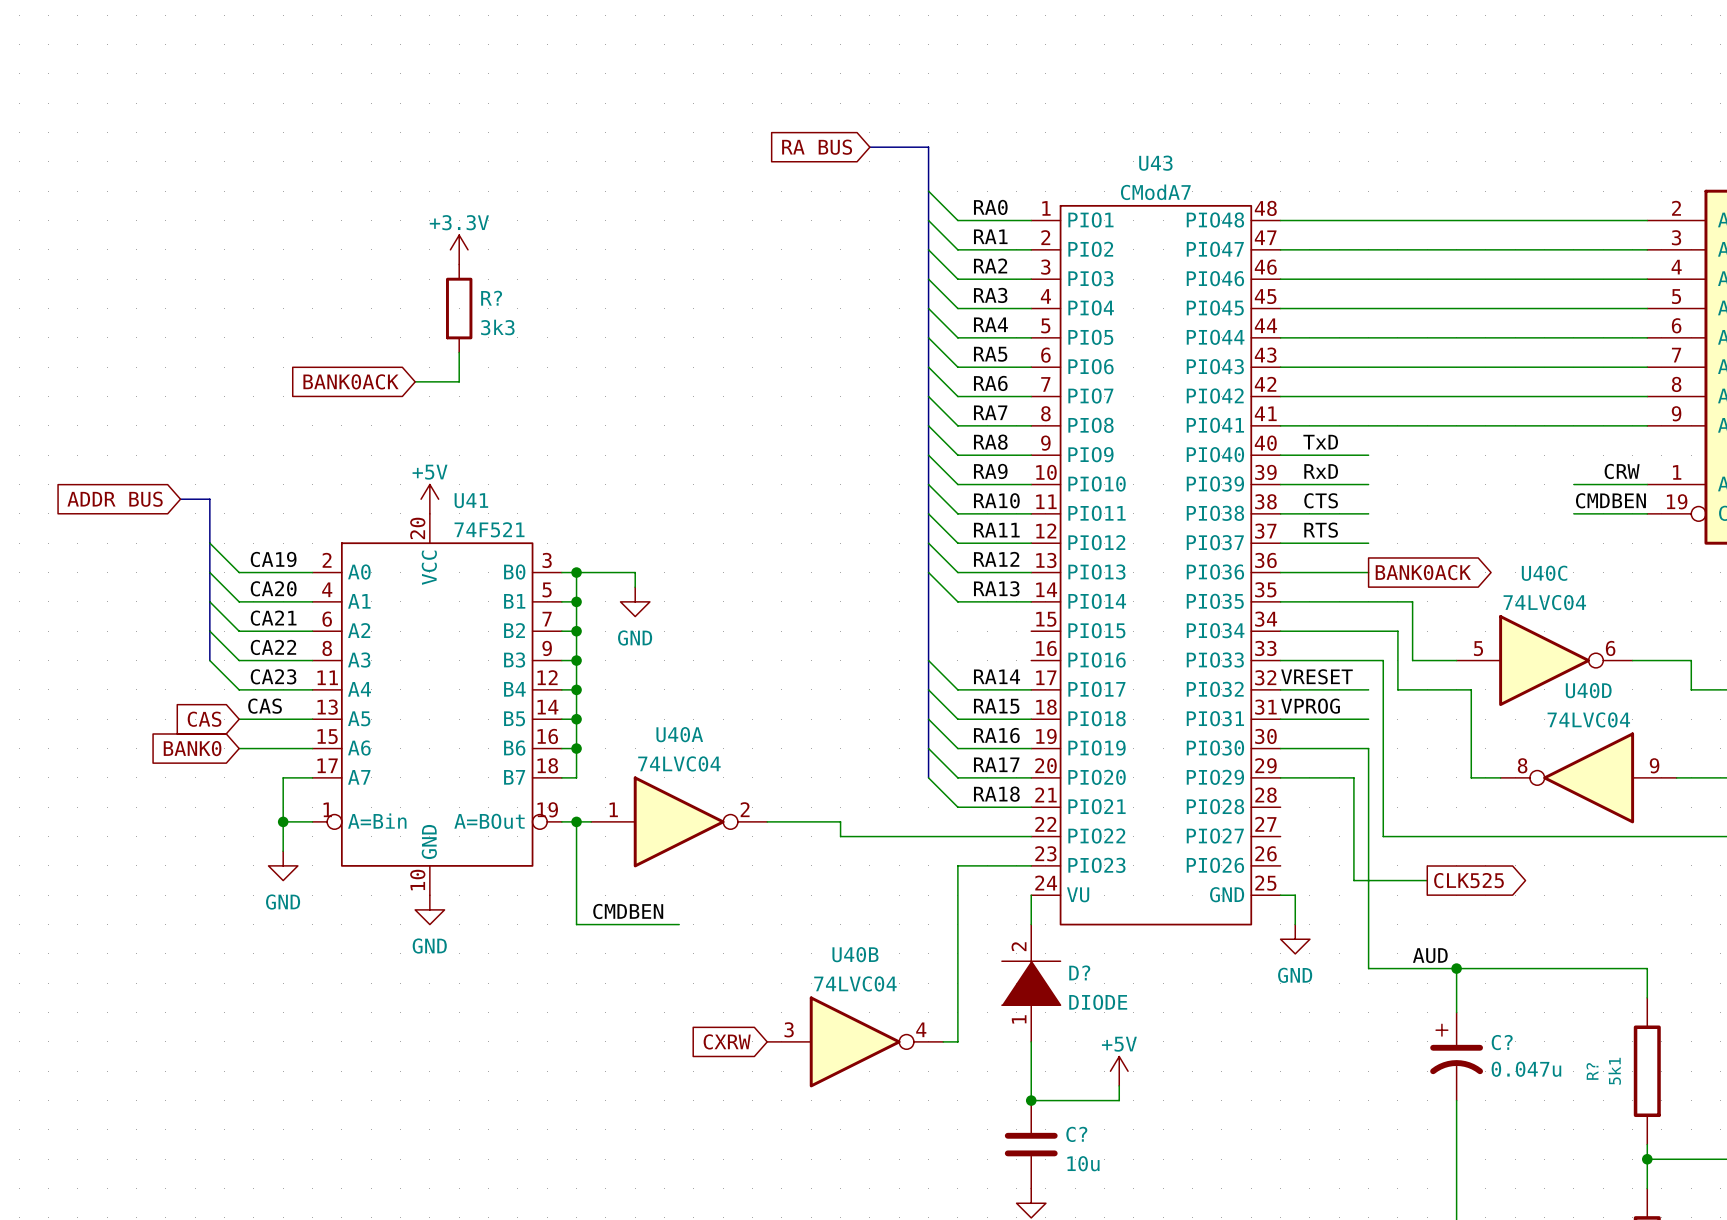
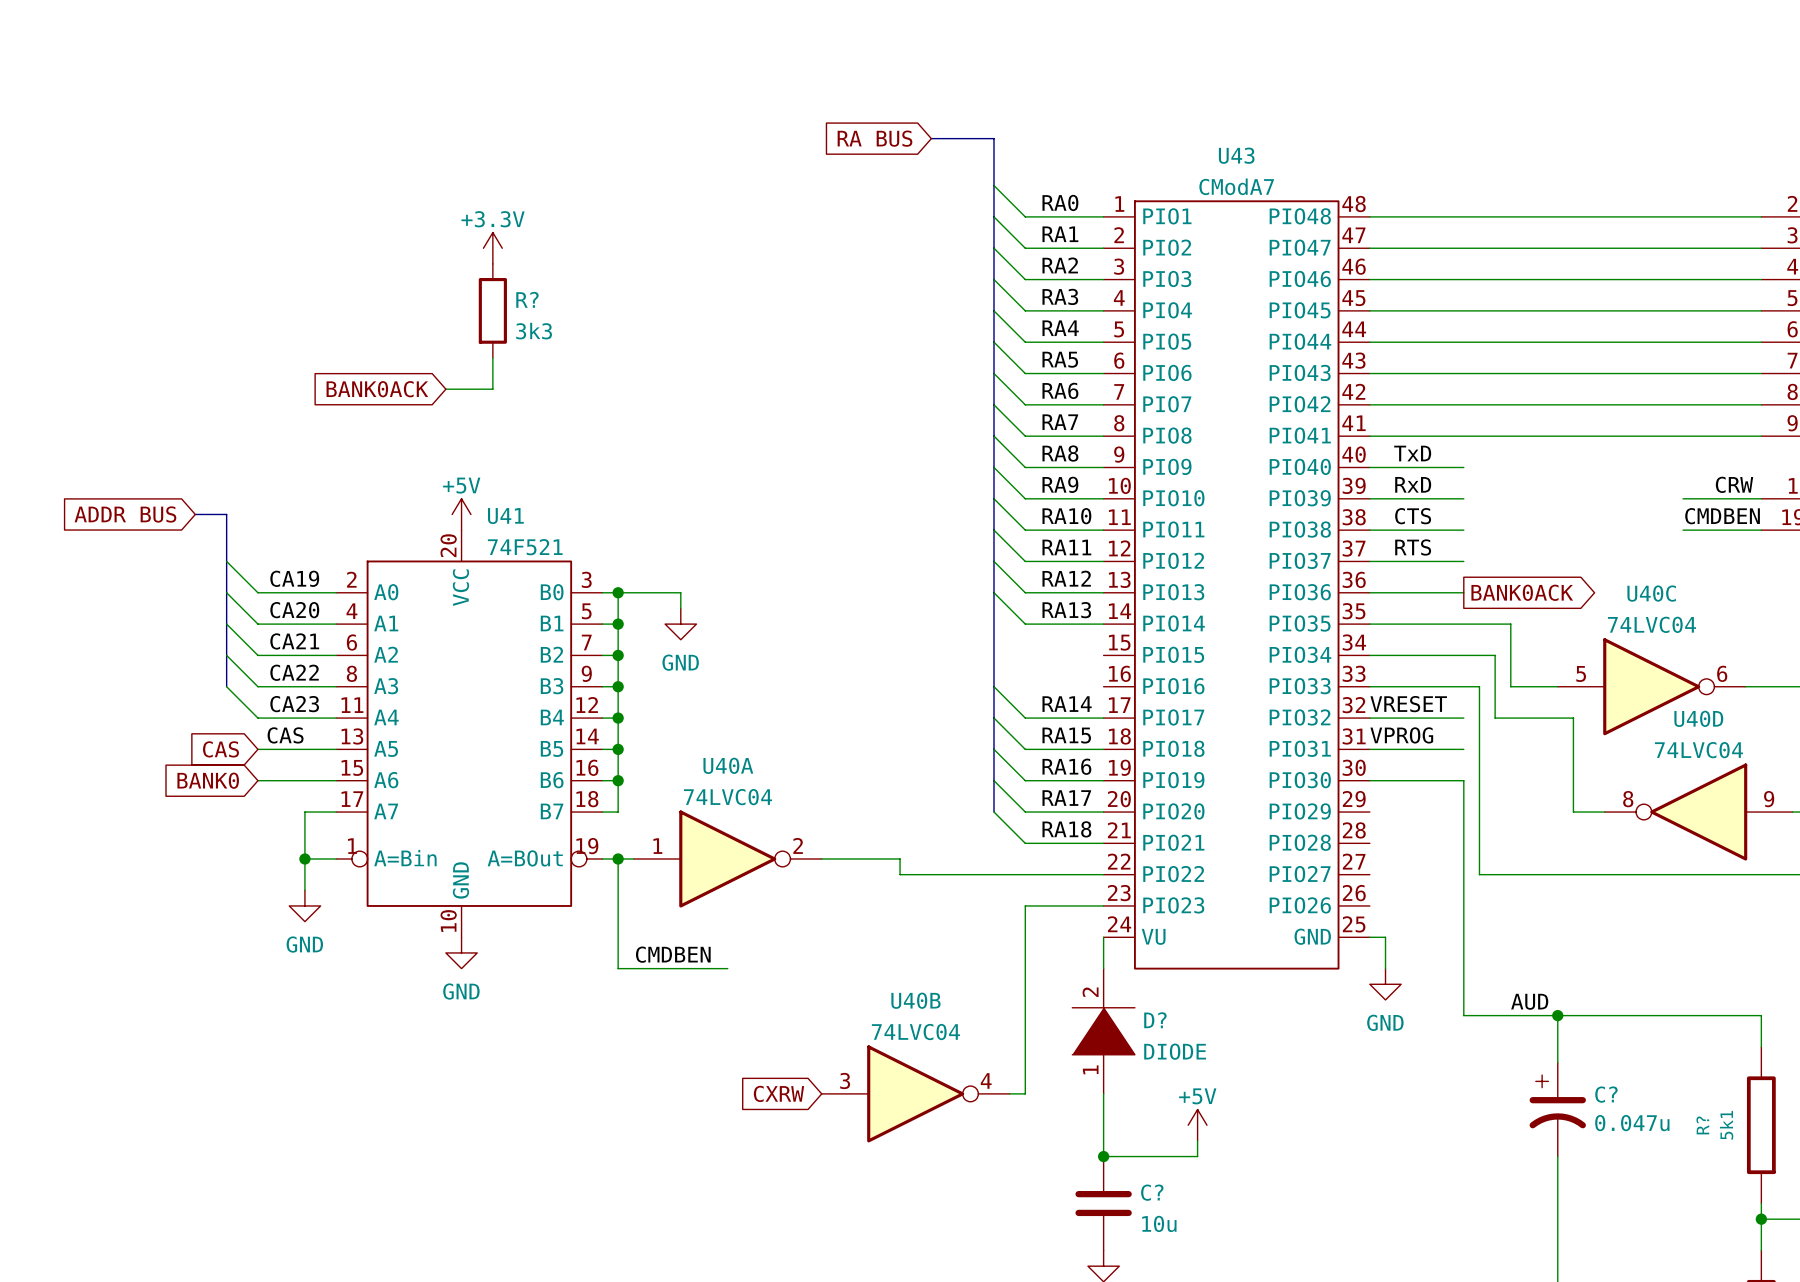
wire: (1280, 777) (1353, 777) (1353, 880) (1427, 880) -> none
global label: CLK525 (1468, 880) -> none

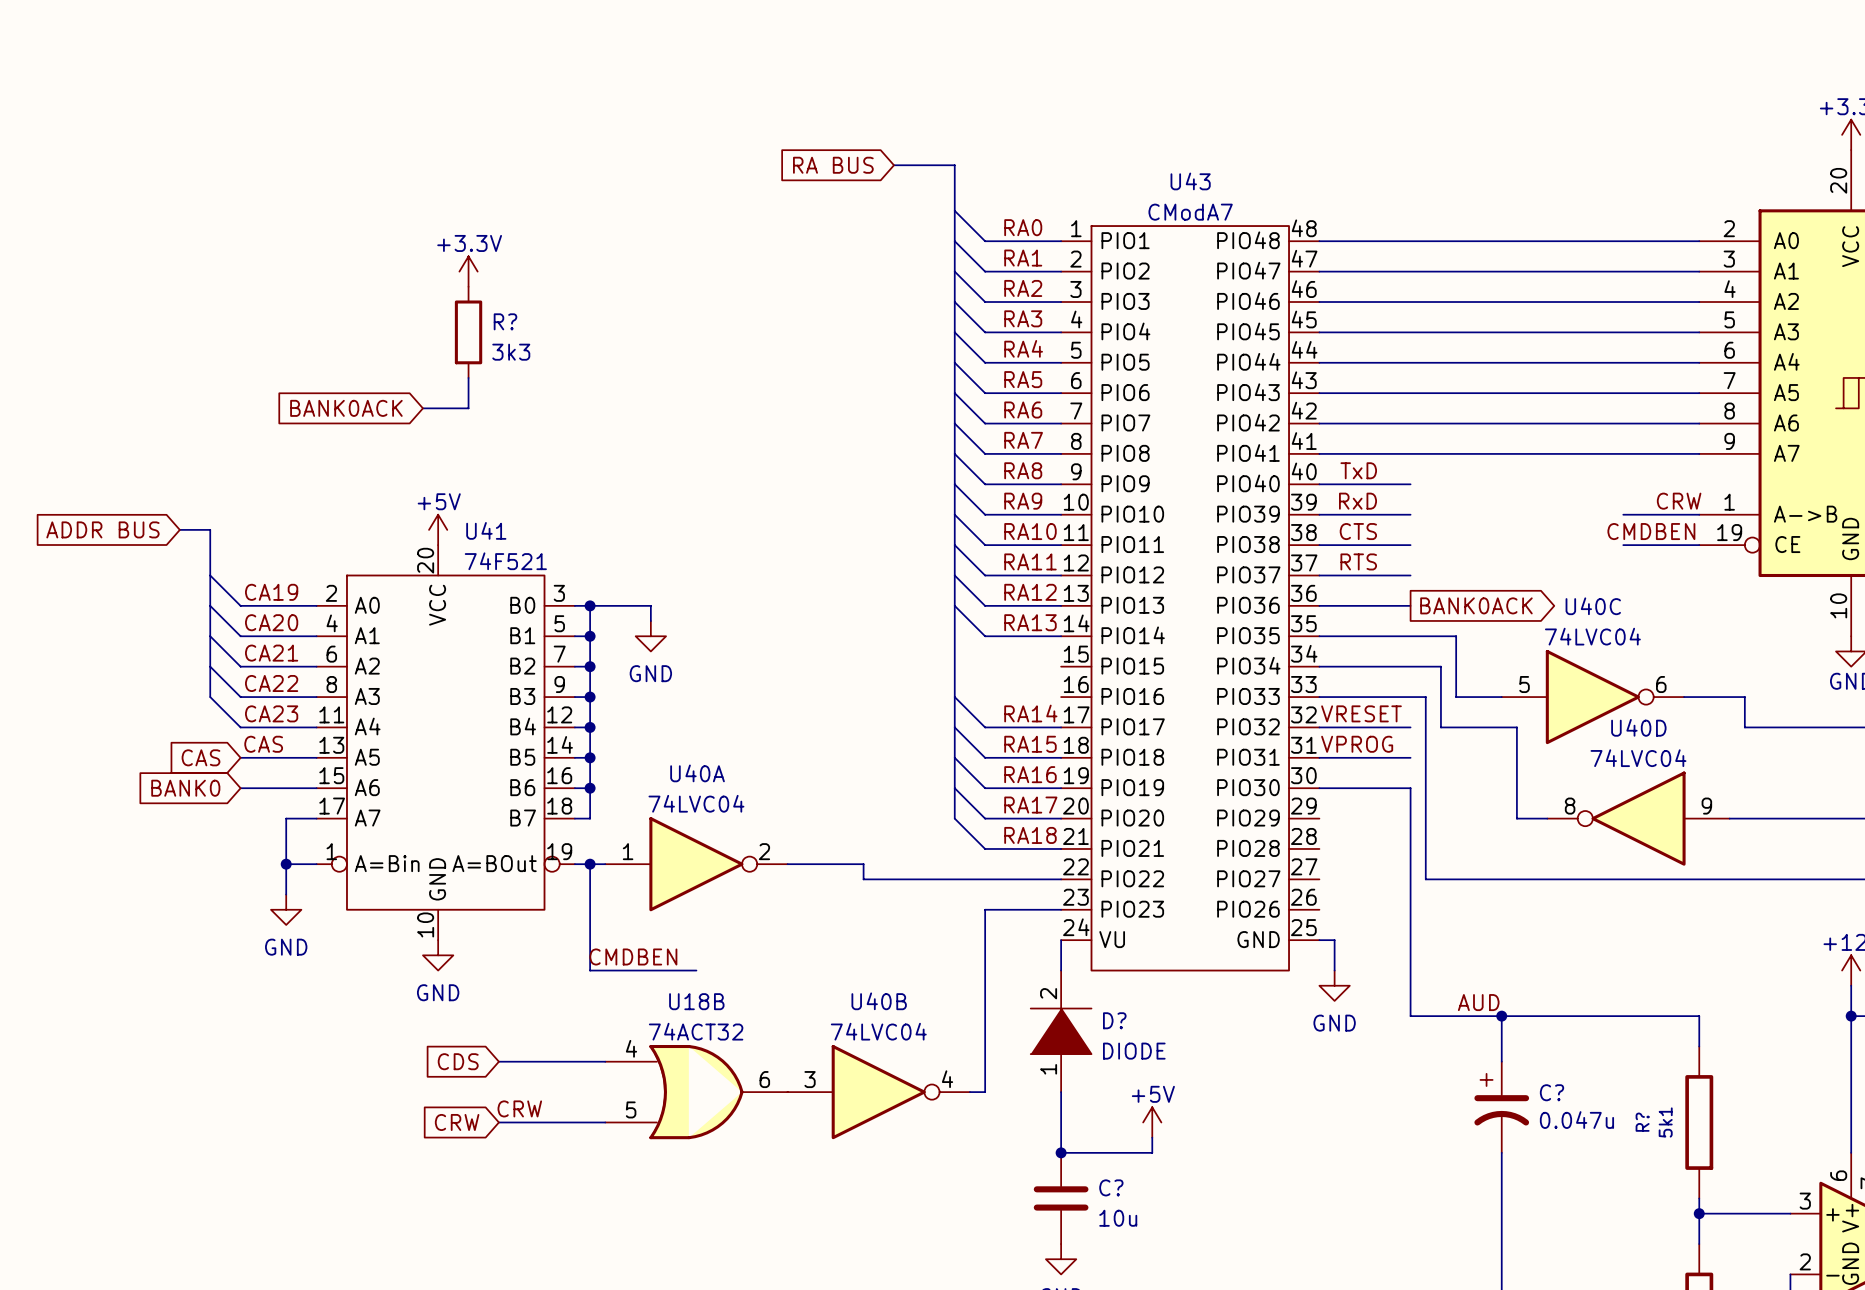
global label: none -> CDS (458, 1061)
wire: none -> (498, 1061) (605, 1061)
U18B: none -> 74ACT32 (696, 1092)
global label: CXRW (778, 1093) -> none
label: none -> CRW (519, 1108)
global label: none -> CRW (457, 1122)
wire: none -> (498, 1122) (605, 1122)

